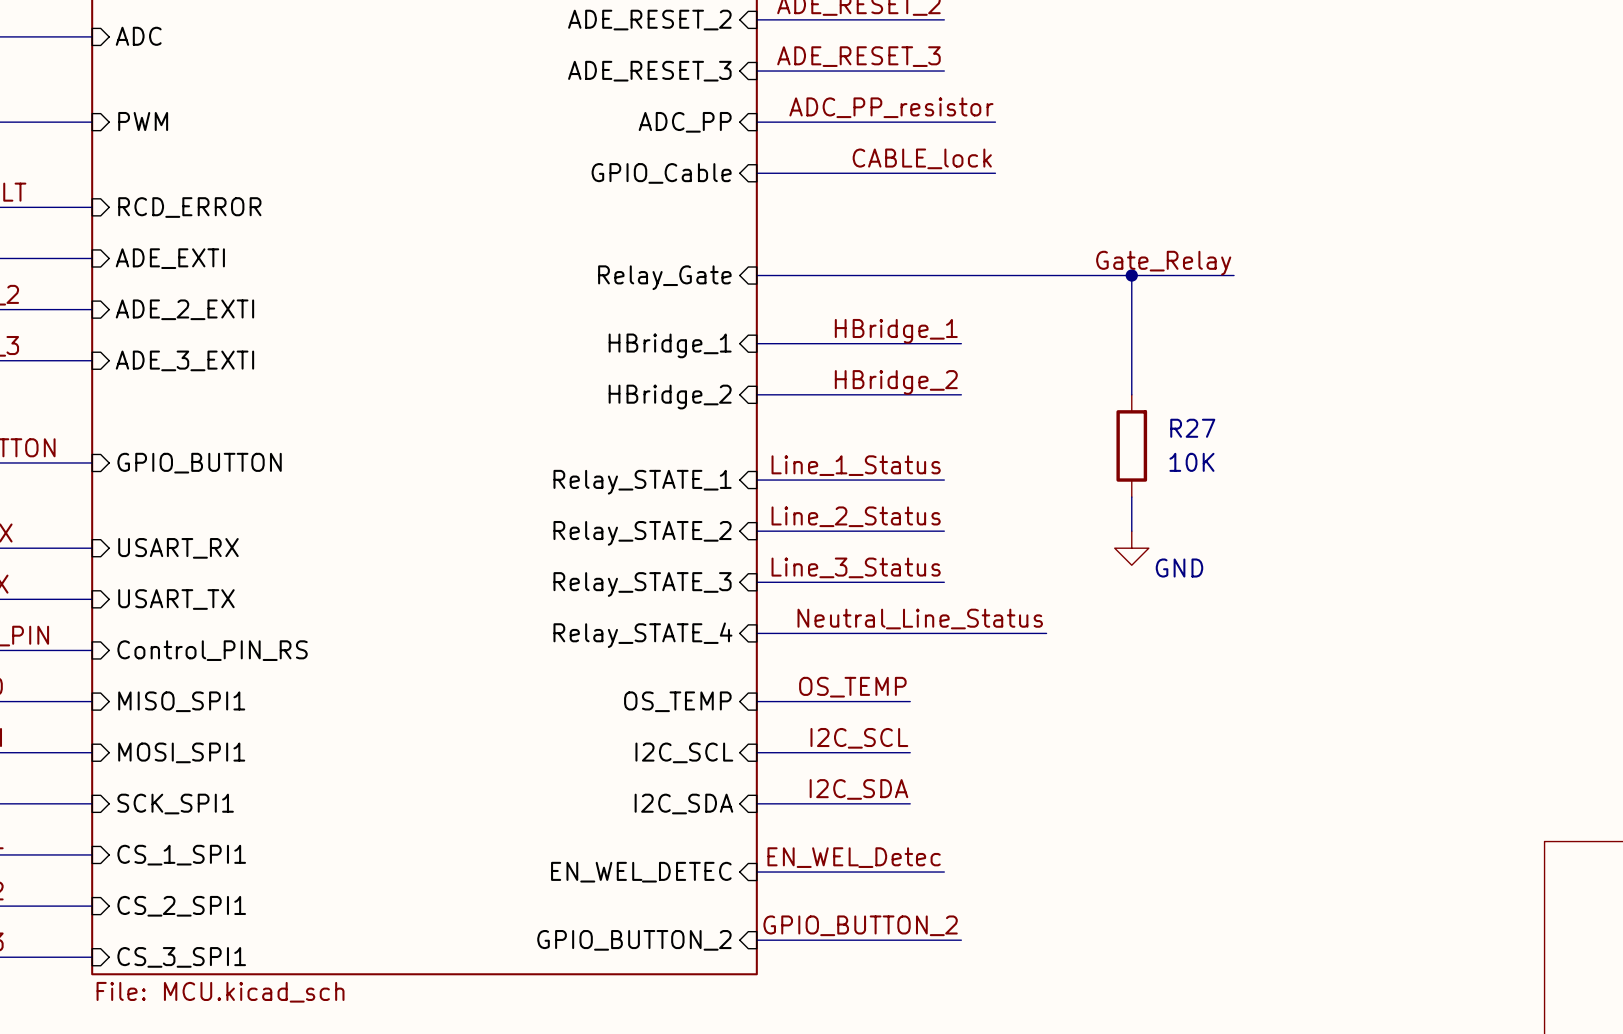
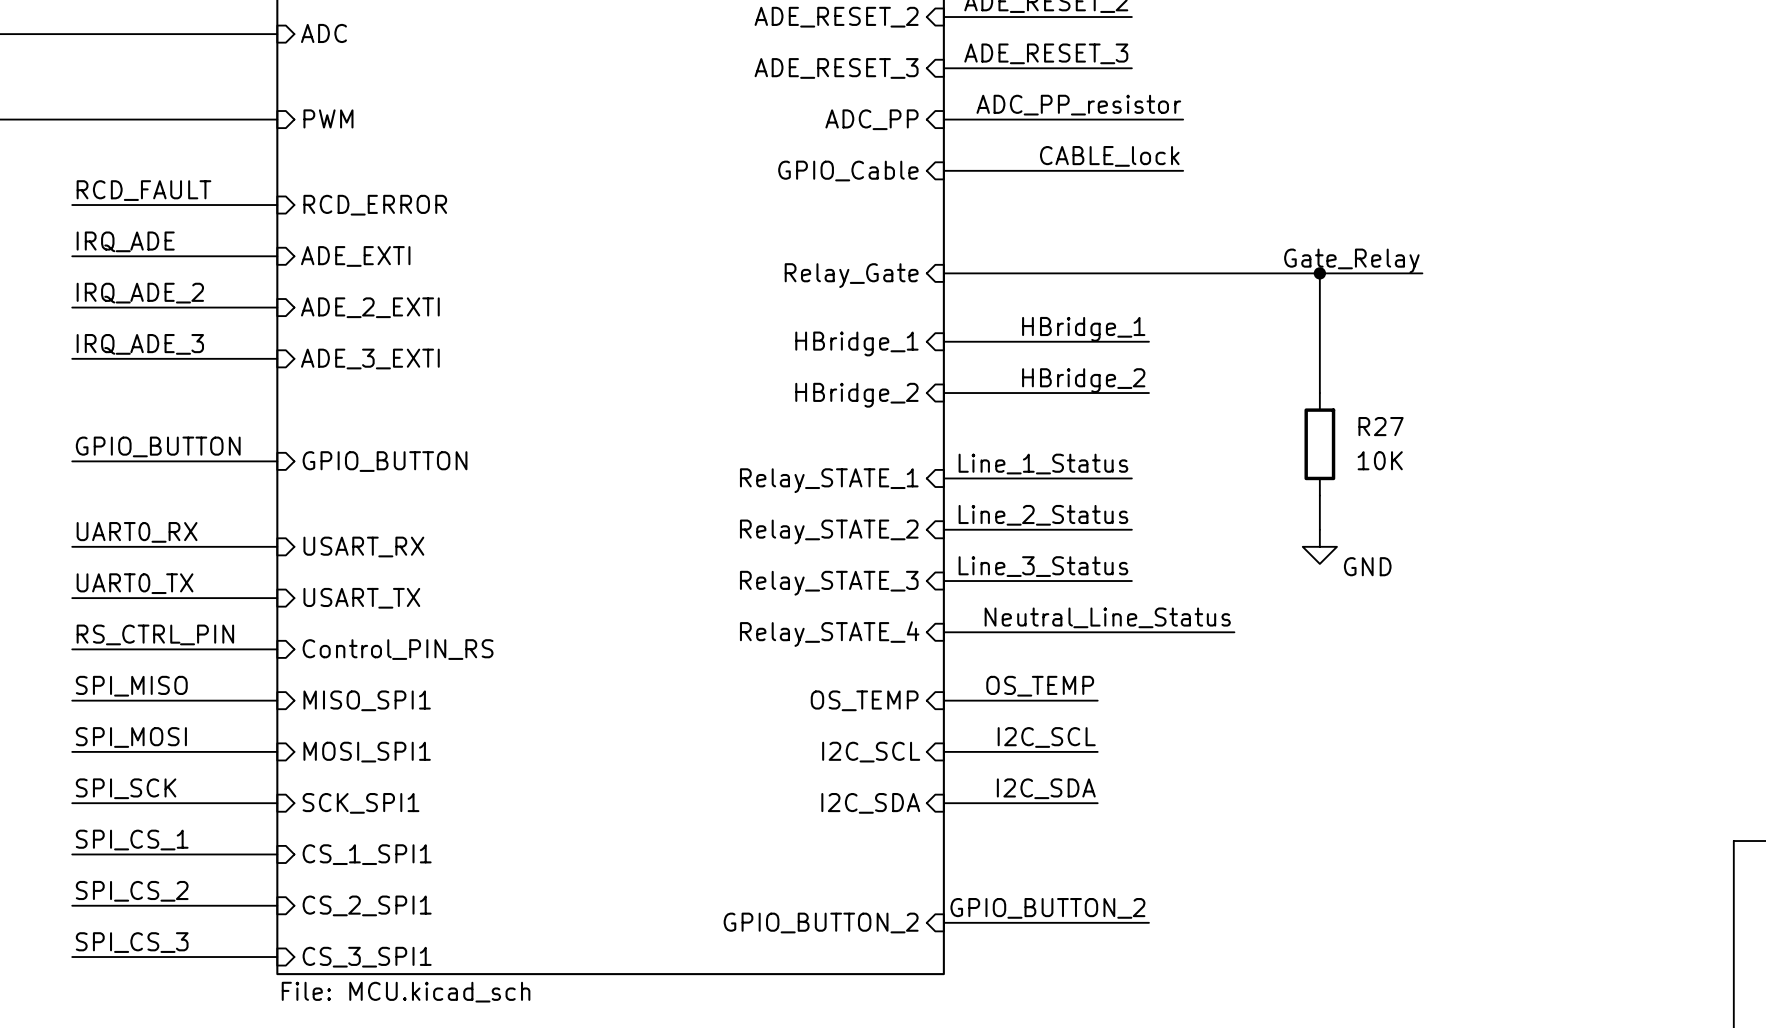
label: EN_WEL_Detec (854, 857) -> none
sheet pin: EN_WEL_DETEC (641, 872) -> none
wire: (756, 872) (944, 872) -> none
label position: GPIO_BUTTON_2 (860, 925) -> GPIO_BUTTON_2 (1047, 908)
sheet pin position: GPIO_BUTTON_2 (634, 940) -> GPIO_BUTTON_2 (821, 923)
wire: (756, 940) (961, 940) -> (943, 922) (1148, 922)

